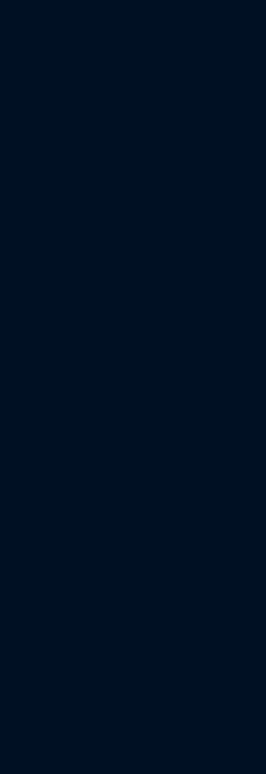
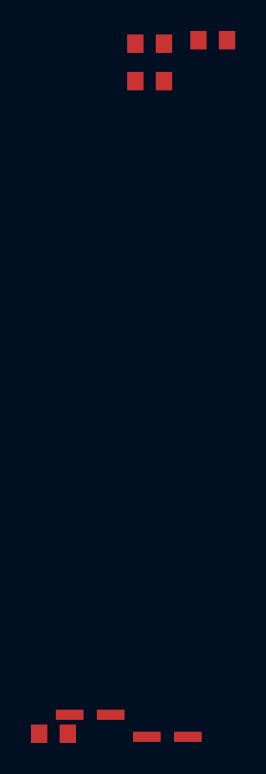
part: none -> (212, 40)
part: none -> (149, 43)
part: none -> (149, 81)
part: none -> (90, 714)
part: none -> (53, 733)
part: none -> (167, 736)

